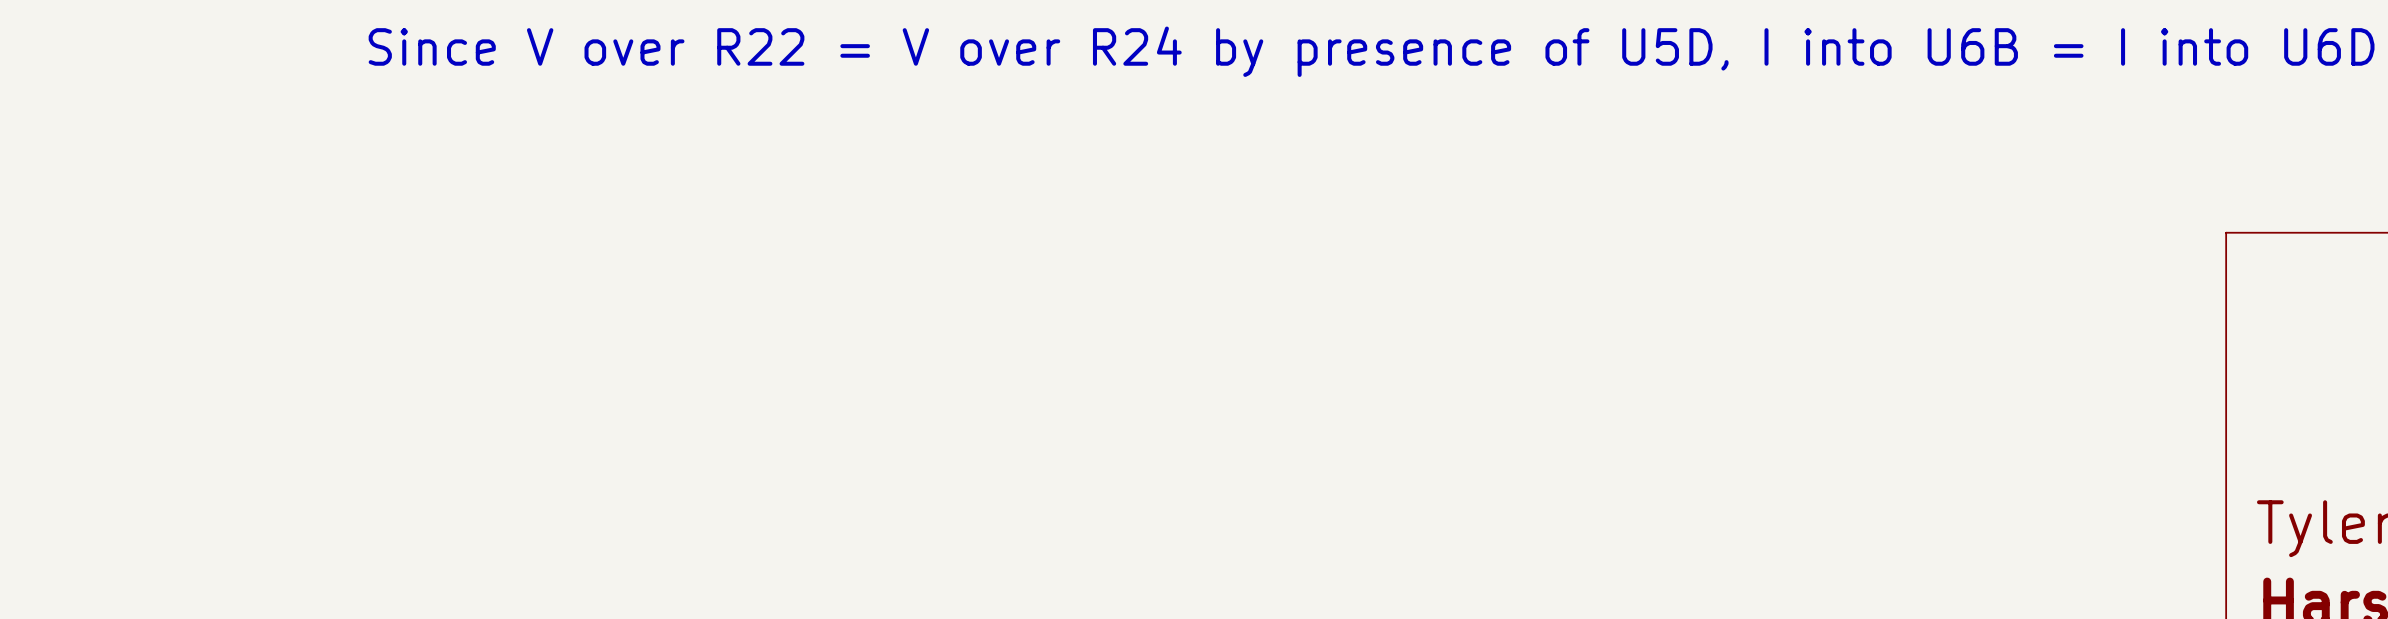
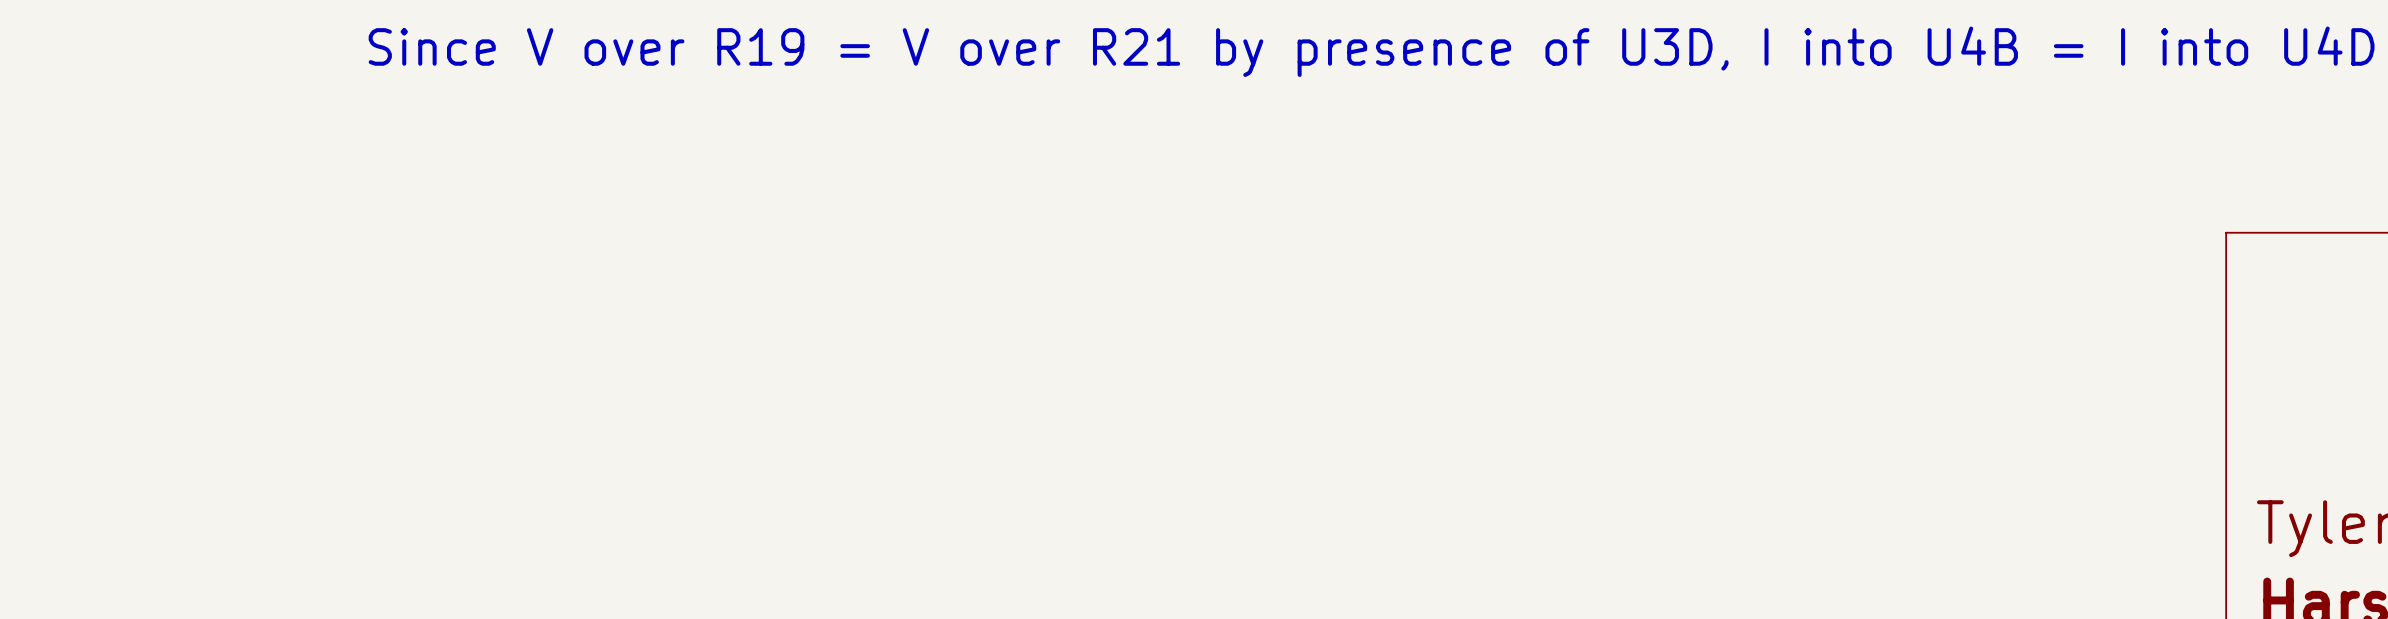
text: Since V over R22 = V over R24 by presence of U5D, I into U6B = I into U6D (1371, 51) -> Since V over R19 = V over R21 by presence of U3D, I into U4B = I into U4D (1371, 51)

